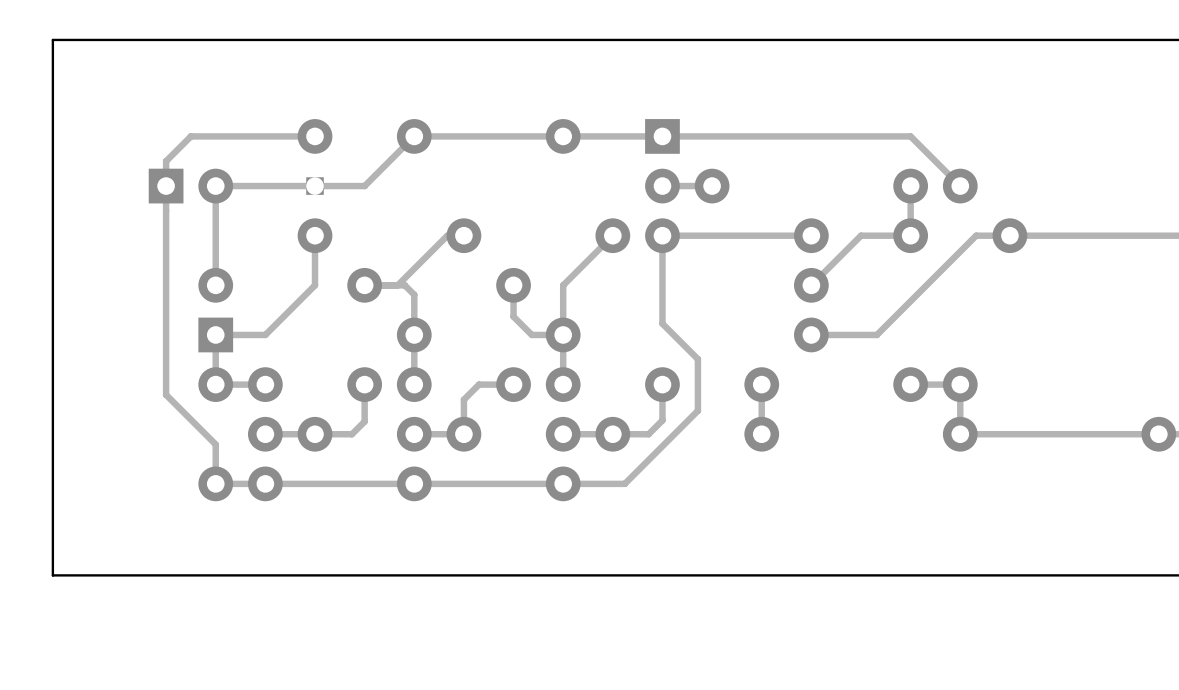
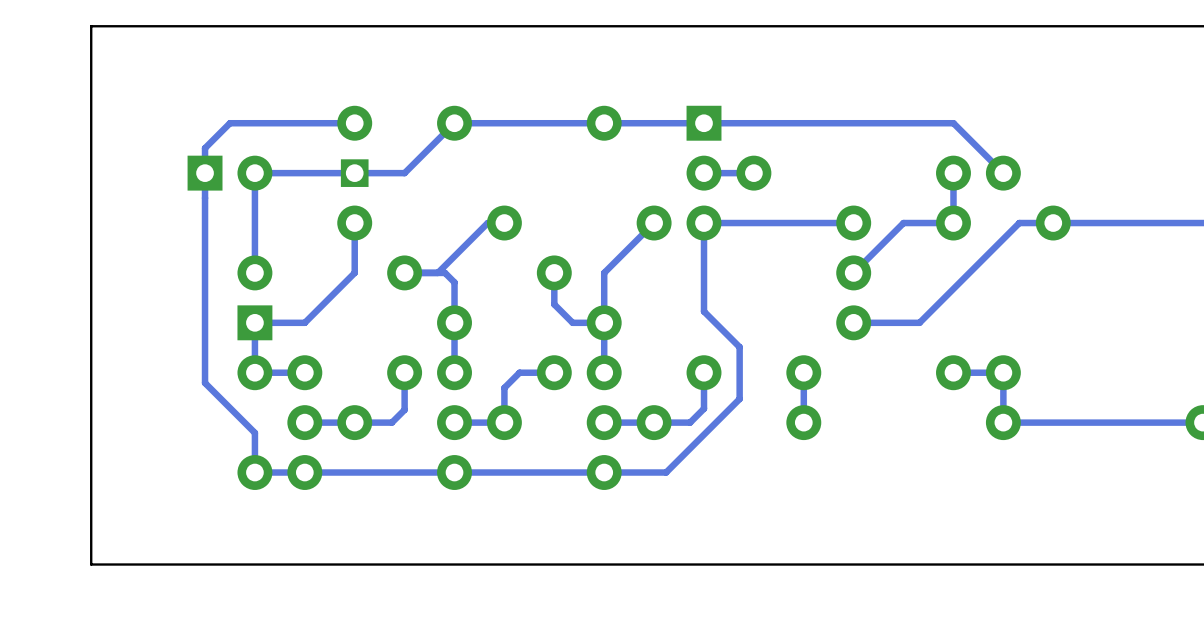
part footprint: [297, 119, 333, 195] -> [337, 105, 373, 187]

